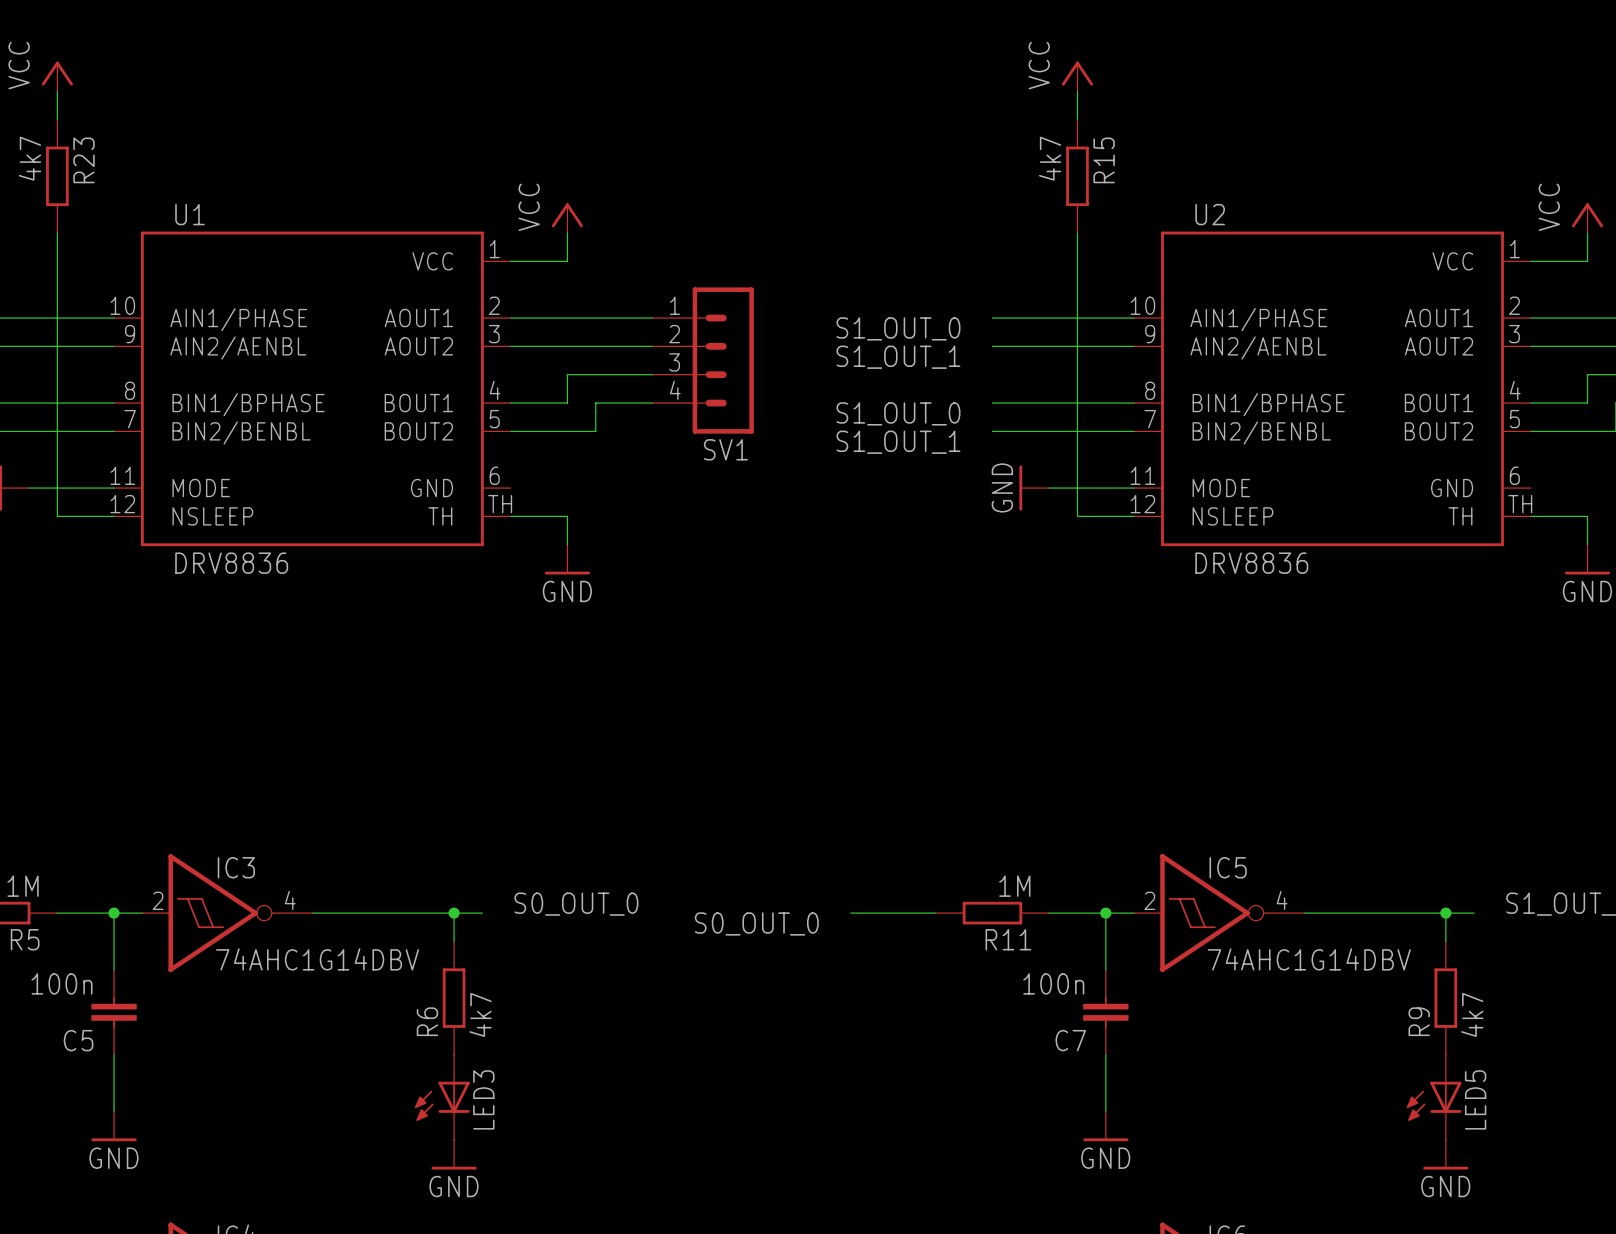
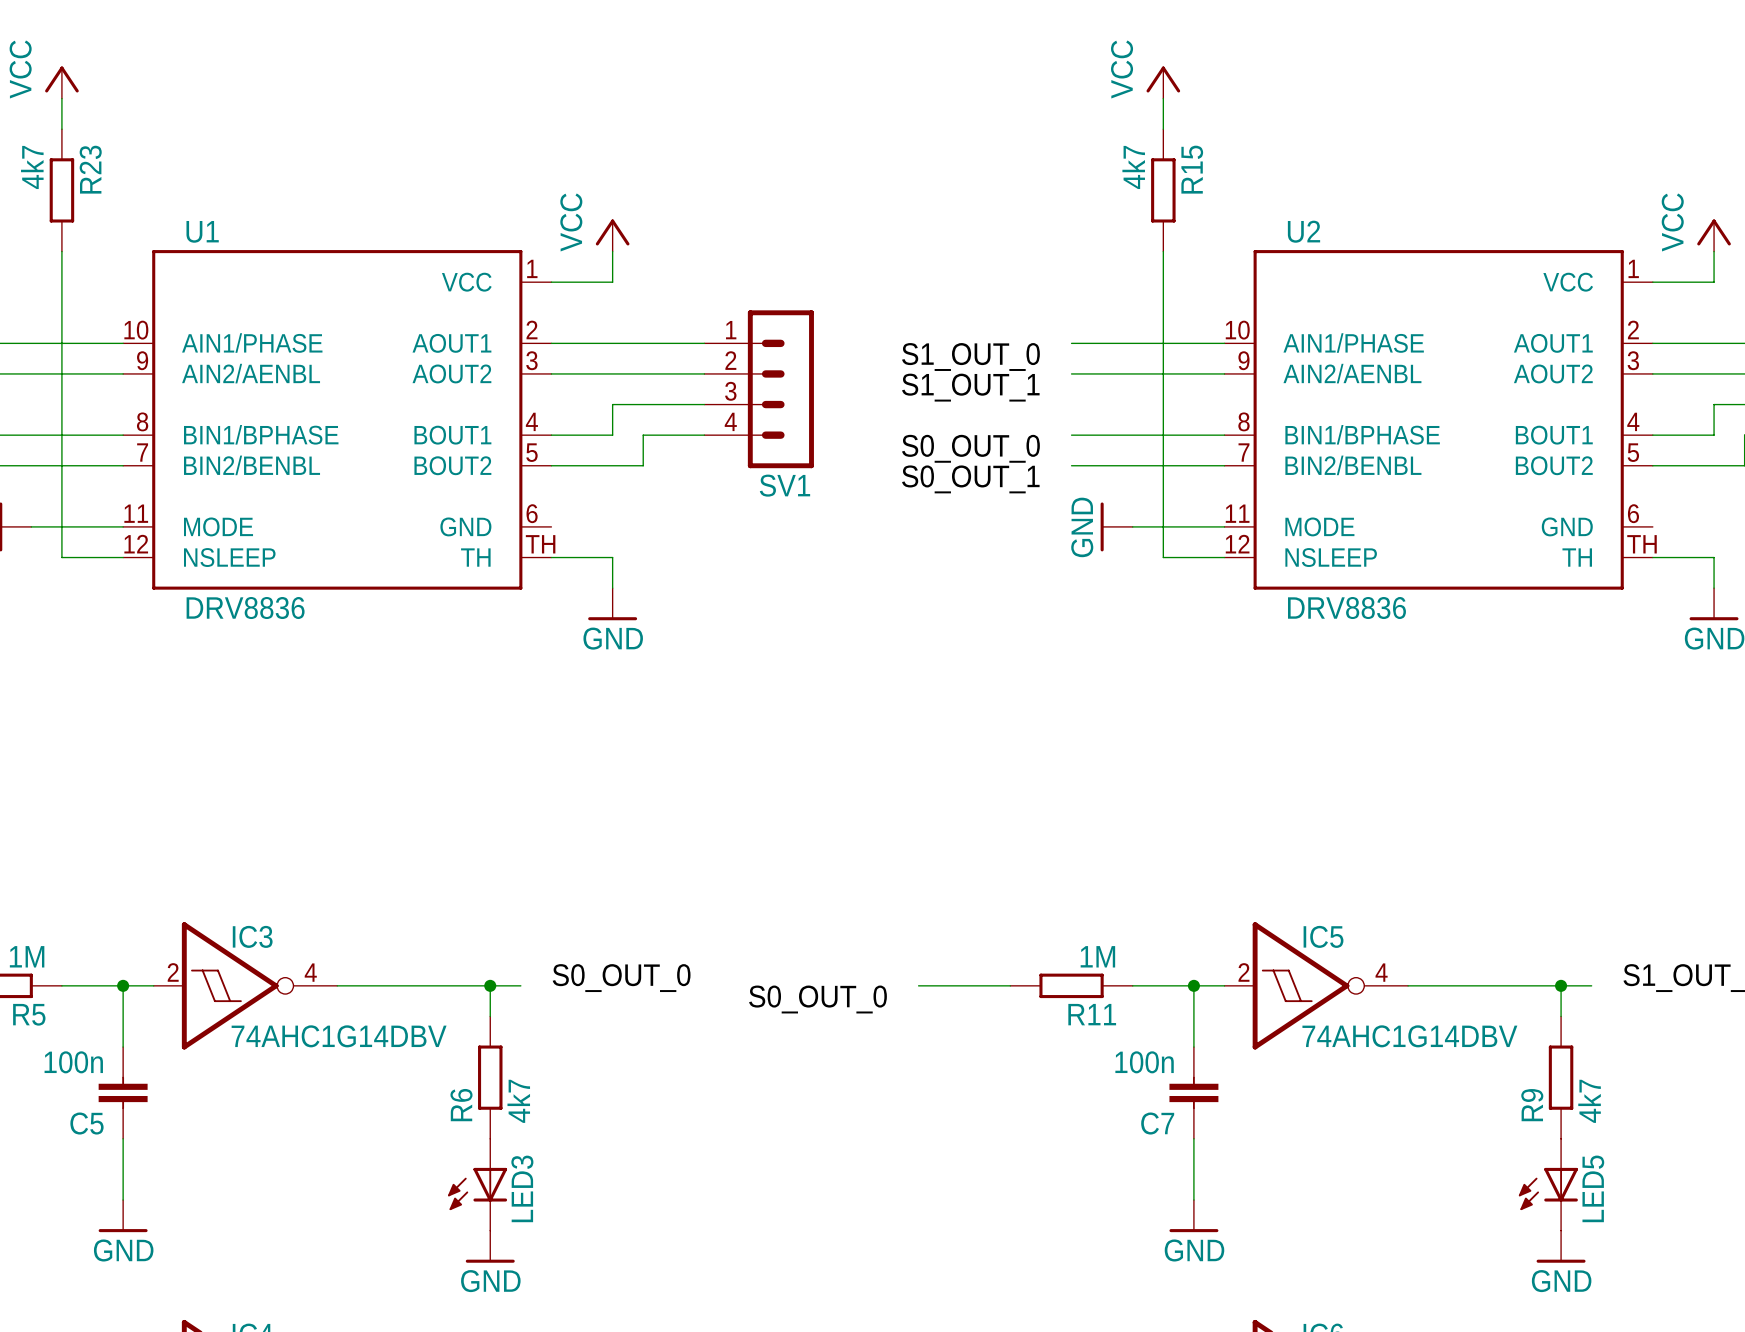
label: S1_OUT_0 (898, 413) -> S0_OUT_0 (970, 448)
label: S1_OUT_1 (898, 442) -> S0_OUT_1 (970, 479)

